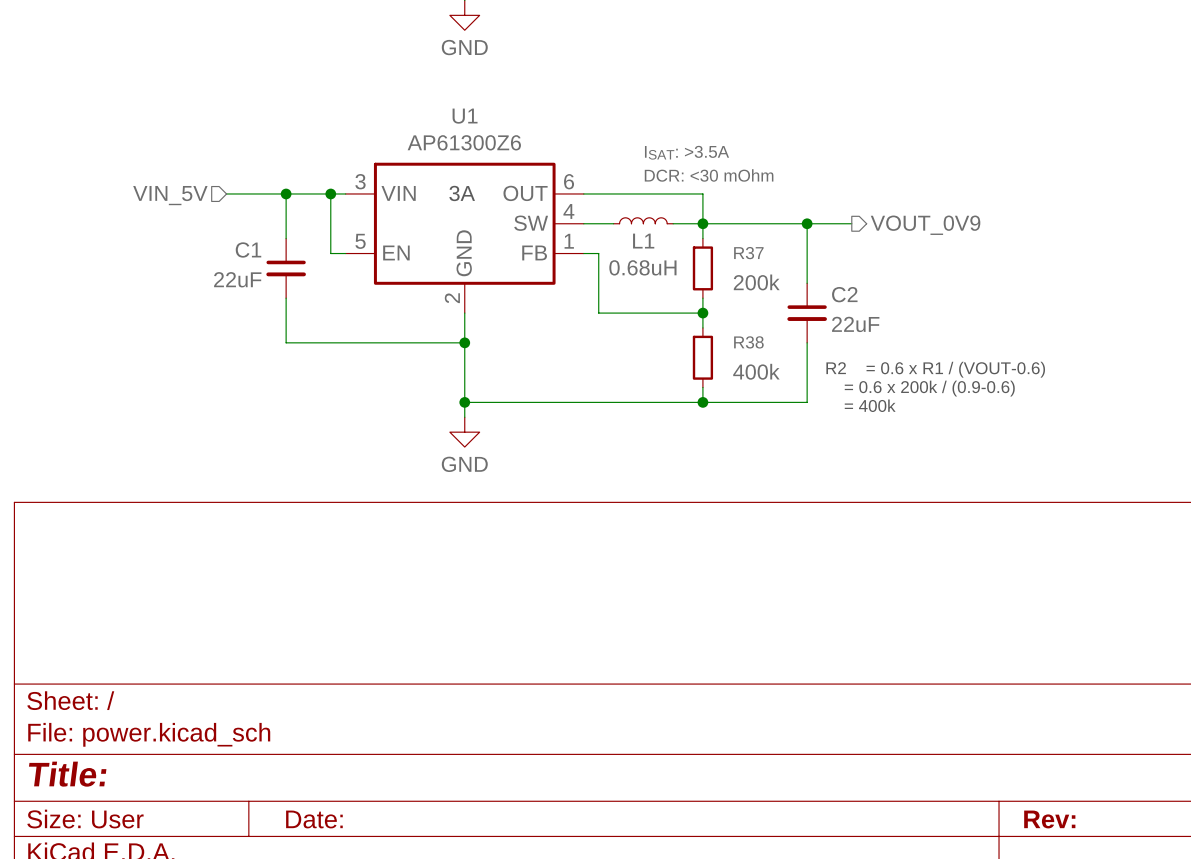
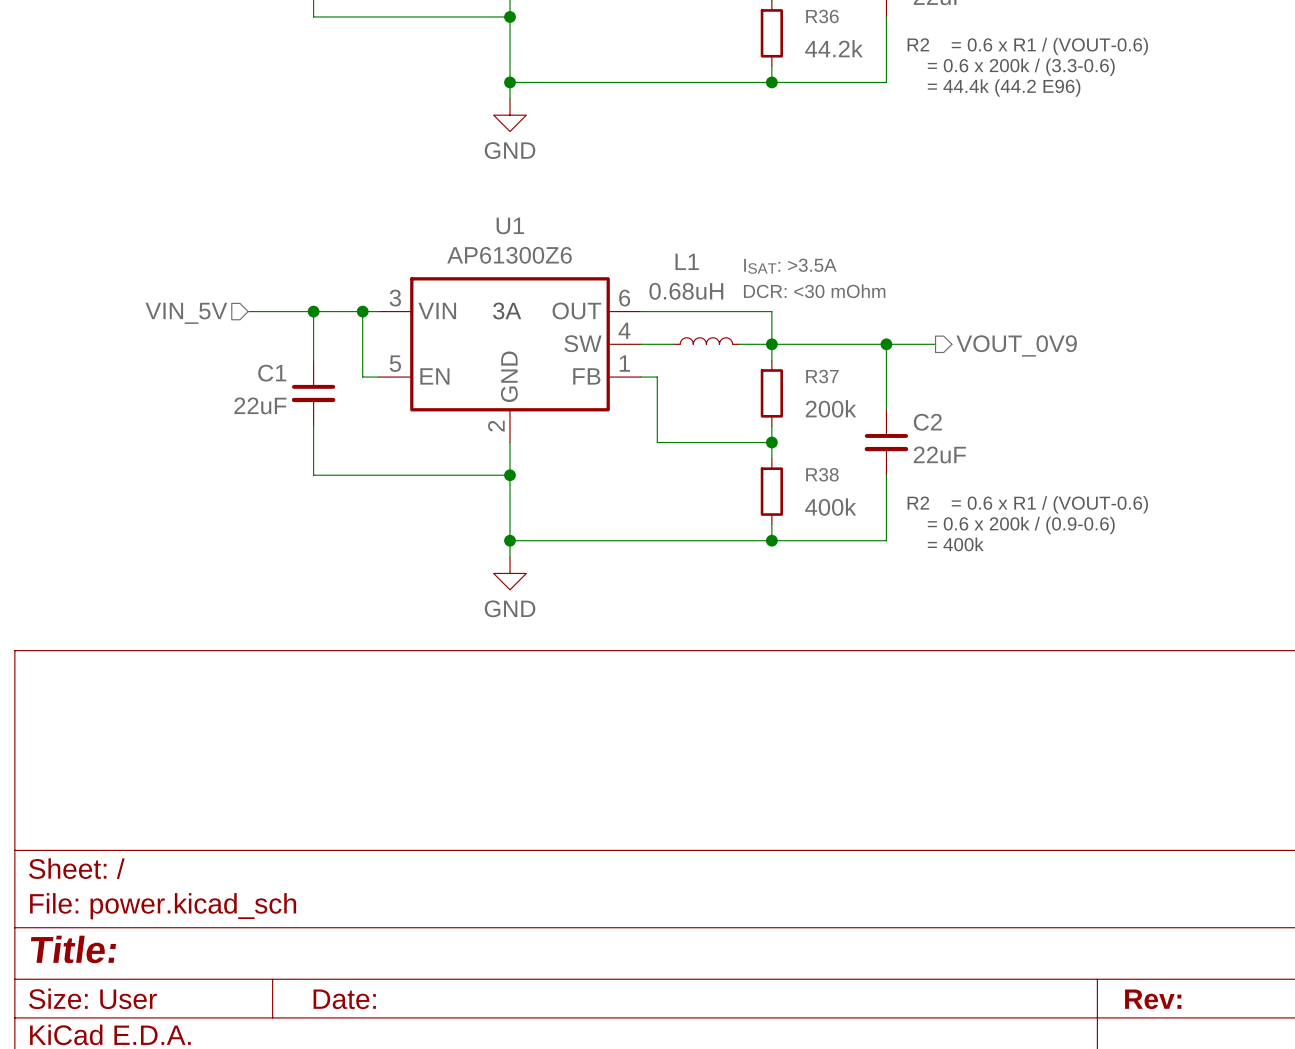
L1 text position: ISAT: >3.5A (687, 152) -> ISAT: >3.5A (790, 266)
L1 text position: DCR: <30 mOhm (709, 175) -> DCR: <30 mOhm (814, 291)
L1 name position: L1 (643, 241) -> L1 (687, 261)
L1 value position: 0.68uH (642, 267) -> 0.68uH (686, 291)

